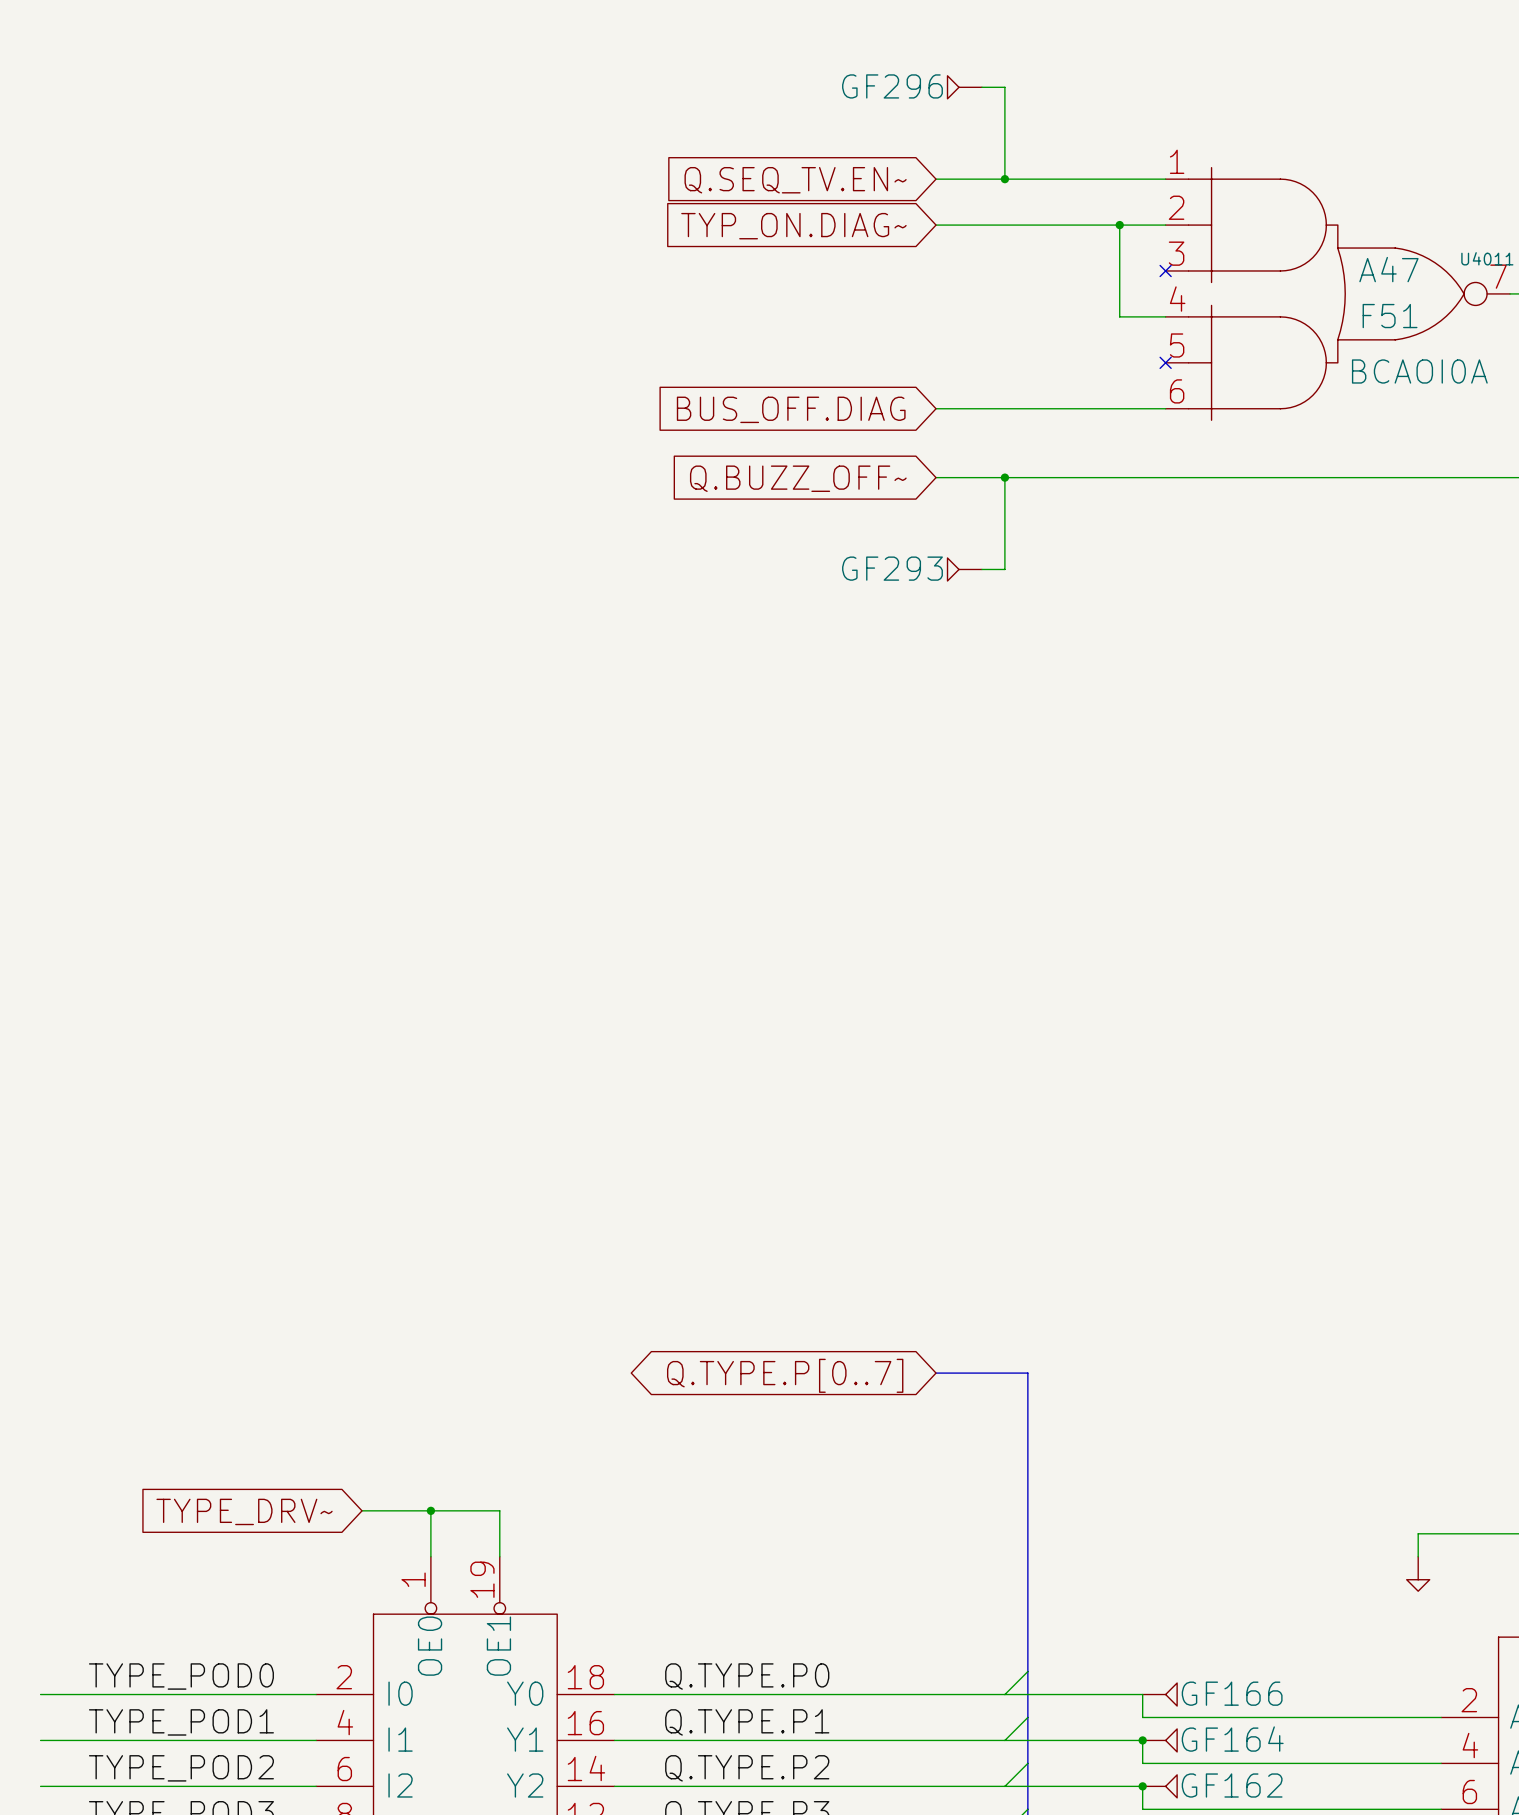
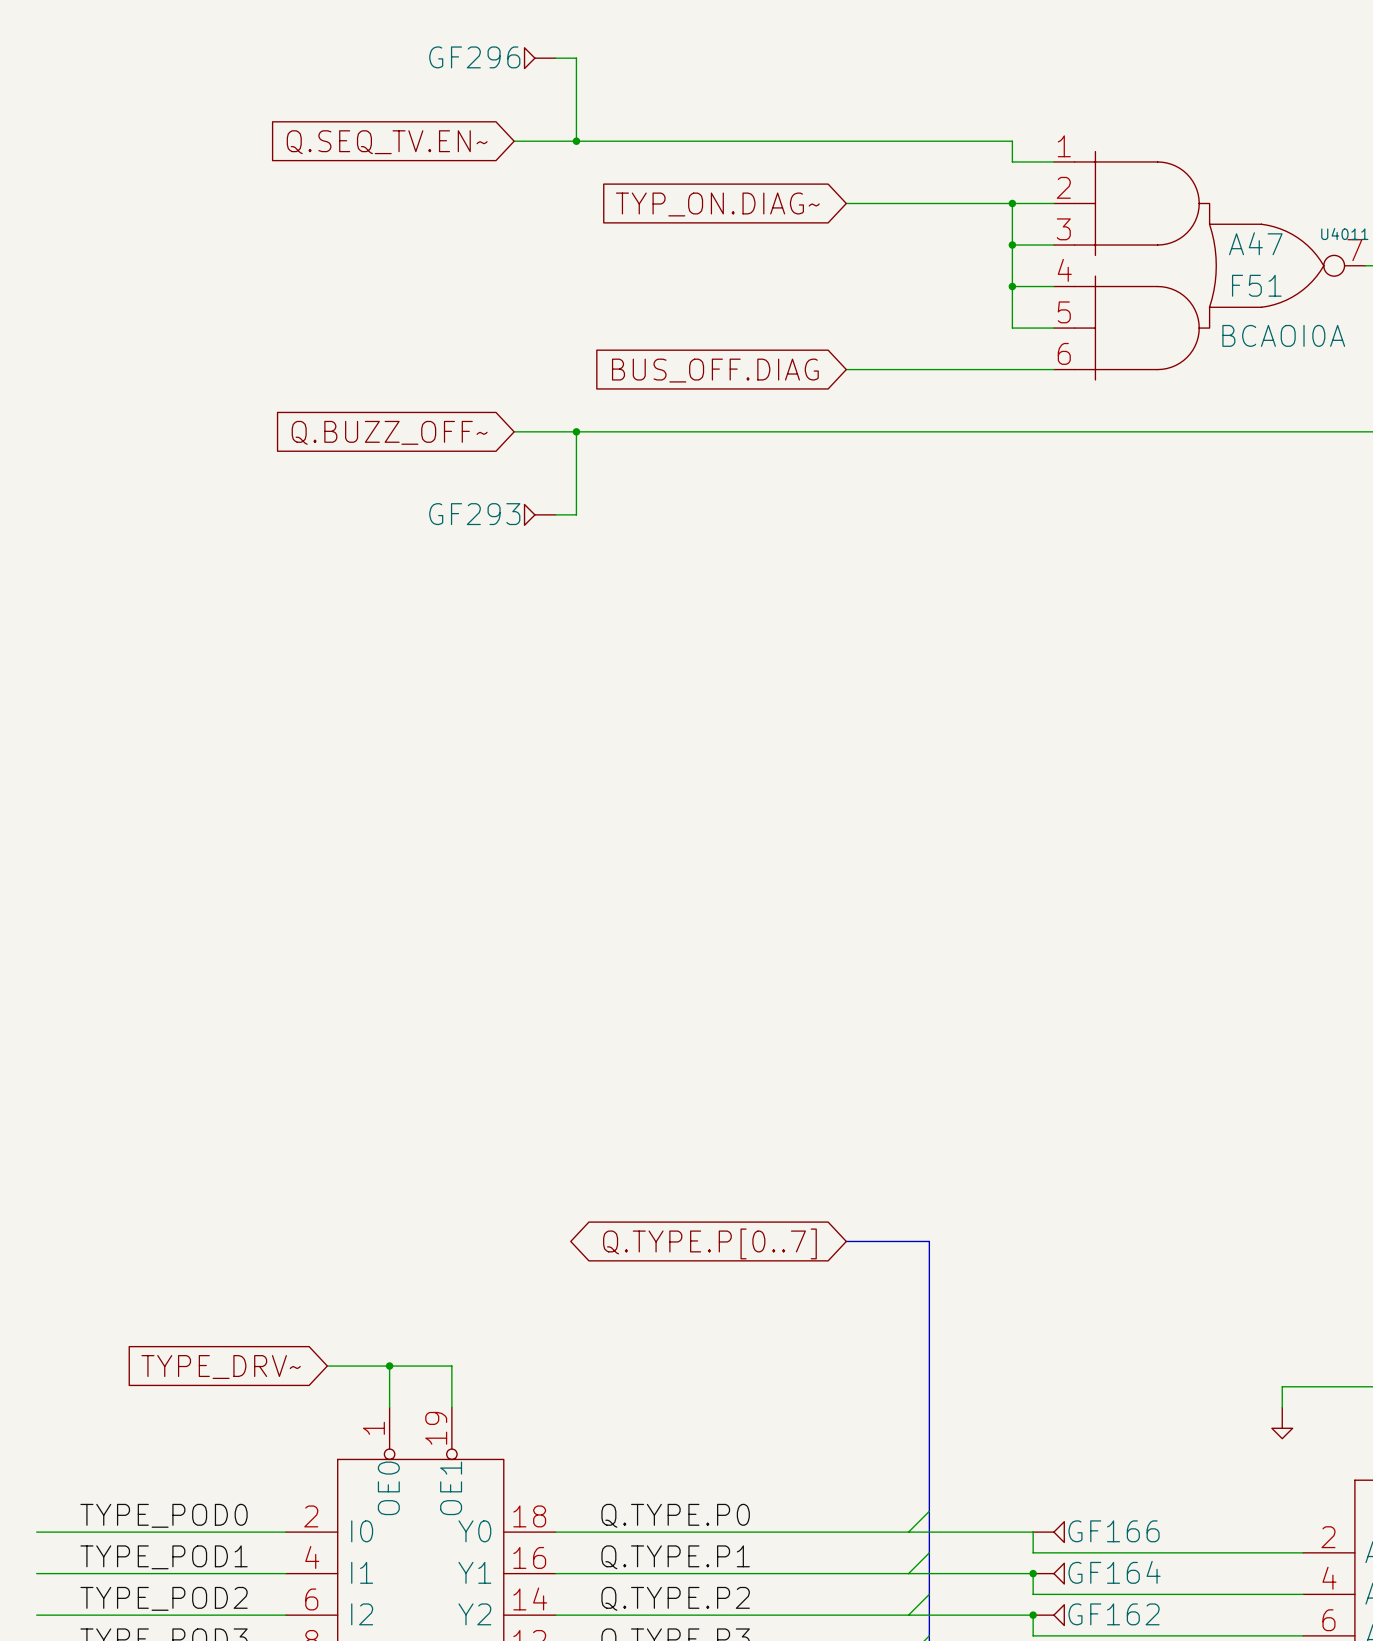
wire: none -> (555, 58) (576, 58) (576, 141)
GF296 position: (964, 87) -> (539, 58)
wire: (981, 87) (1004, 87) (1004, 179) -> none
junction: none -> (576, 141)
global label: none -> Q.SEQ_TV.EN~ (387, 142)
wire: (936, 179) (1119, 179) -> (514, 141) (1012, 141) (1012, 161)
junction: (1004, 179) -> none
global label: Q.SEQ_TV.EN~ (795, 180) -> none
wire: none -> (1012, 245) (1053, 245)
junction: none -> (1012, 245)
no-connect mark: (1165, 270) -> none
wire: none -> (1012, 286) (1012, 328) (1053, 328)
junction: none -> (1012, 286)
no-connect mark: (1165, 362) -> none
wire: none -> (514, 431) (846, 431)
wire: none -> (576, 431) (576, 514) (555, 514)
junction: none -> (576, 431)
wire: (1004, 477) (1004, 569) (981, 569) -> none
junction: (1004, 477) -> none
global label: none -> Q.BUZZ_OFF~ (389, 432)
global label: Q.BUZZ_OFF~ (798, 478) -> none
GF293 position: (964, 569) -> (539, 514)

